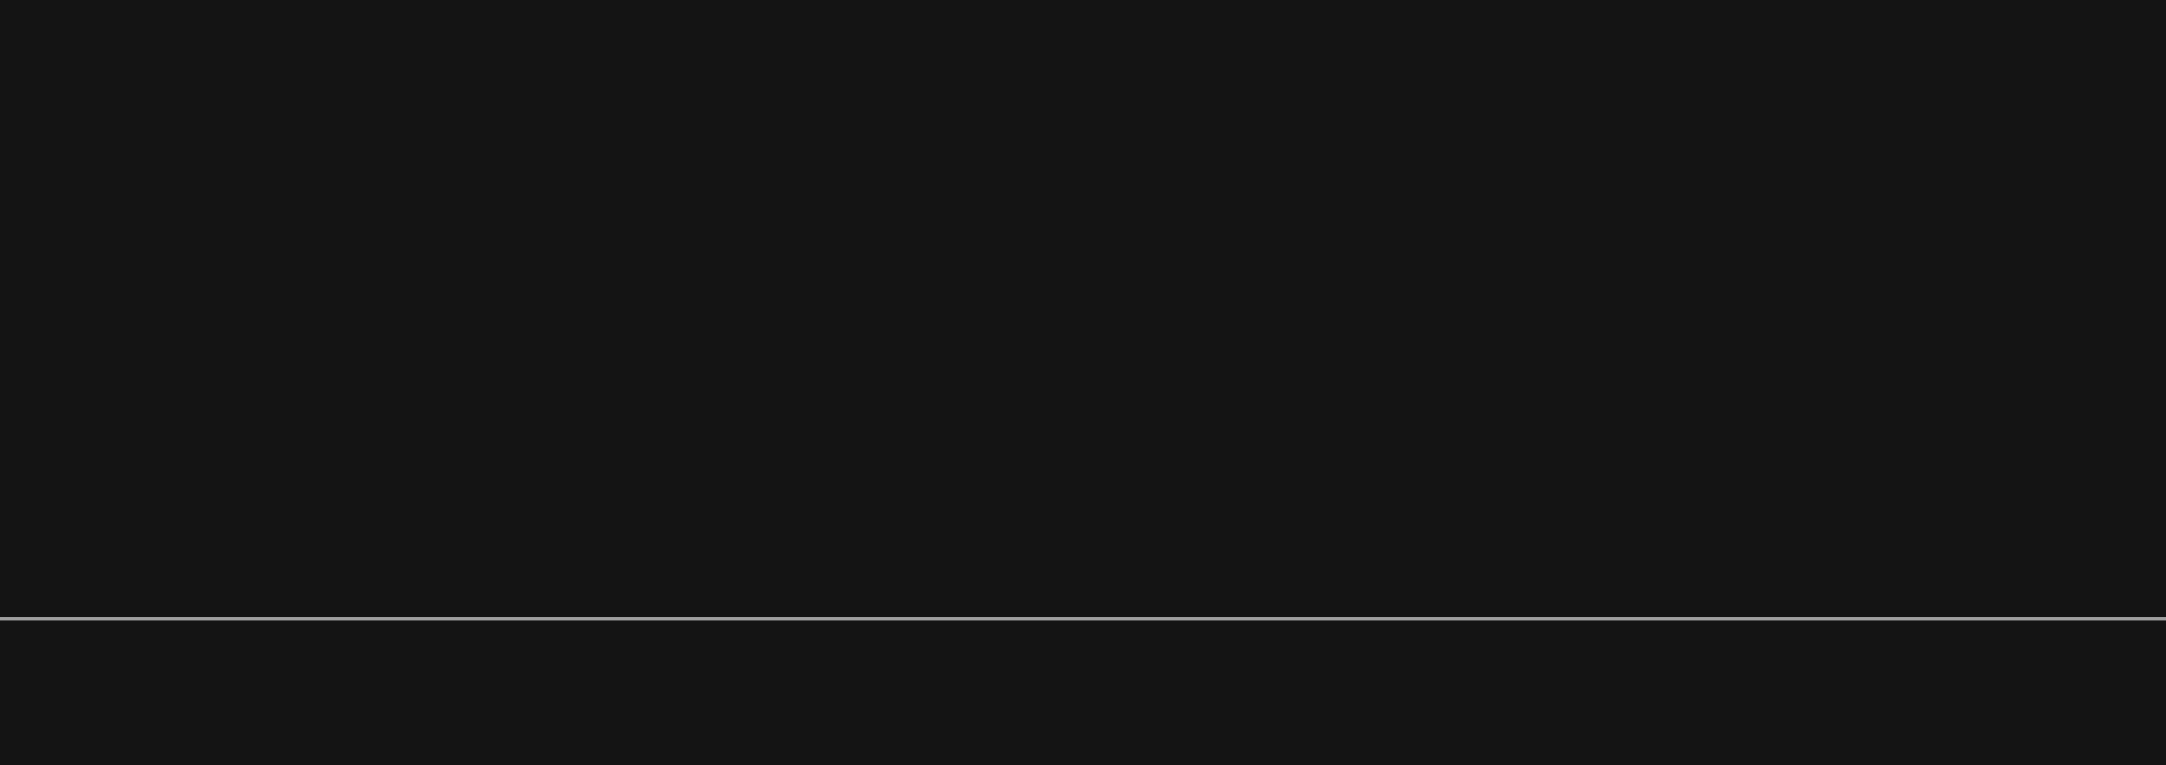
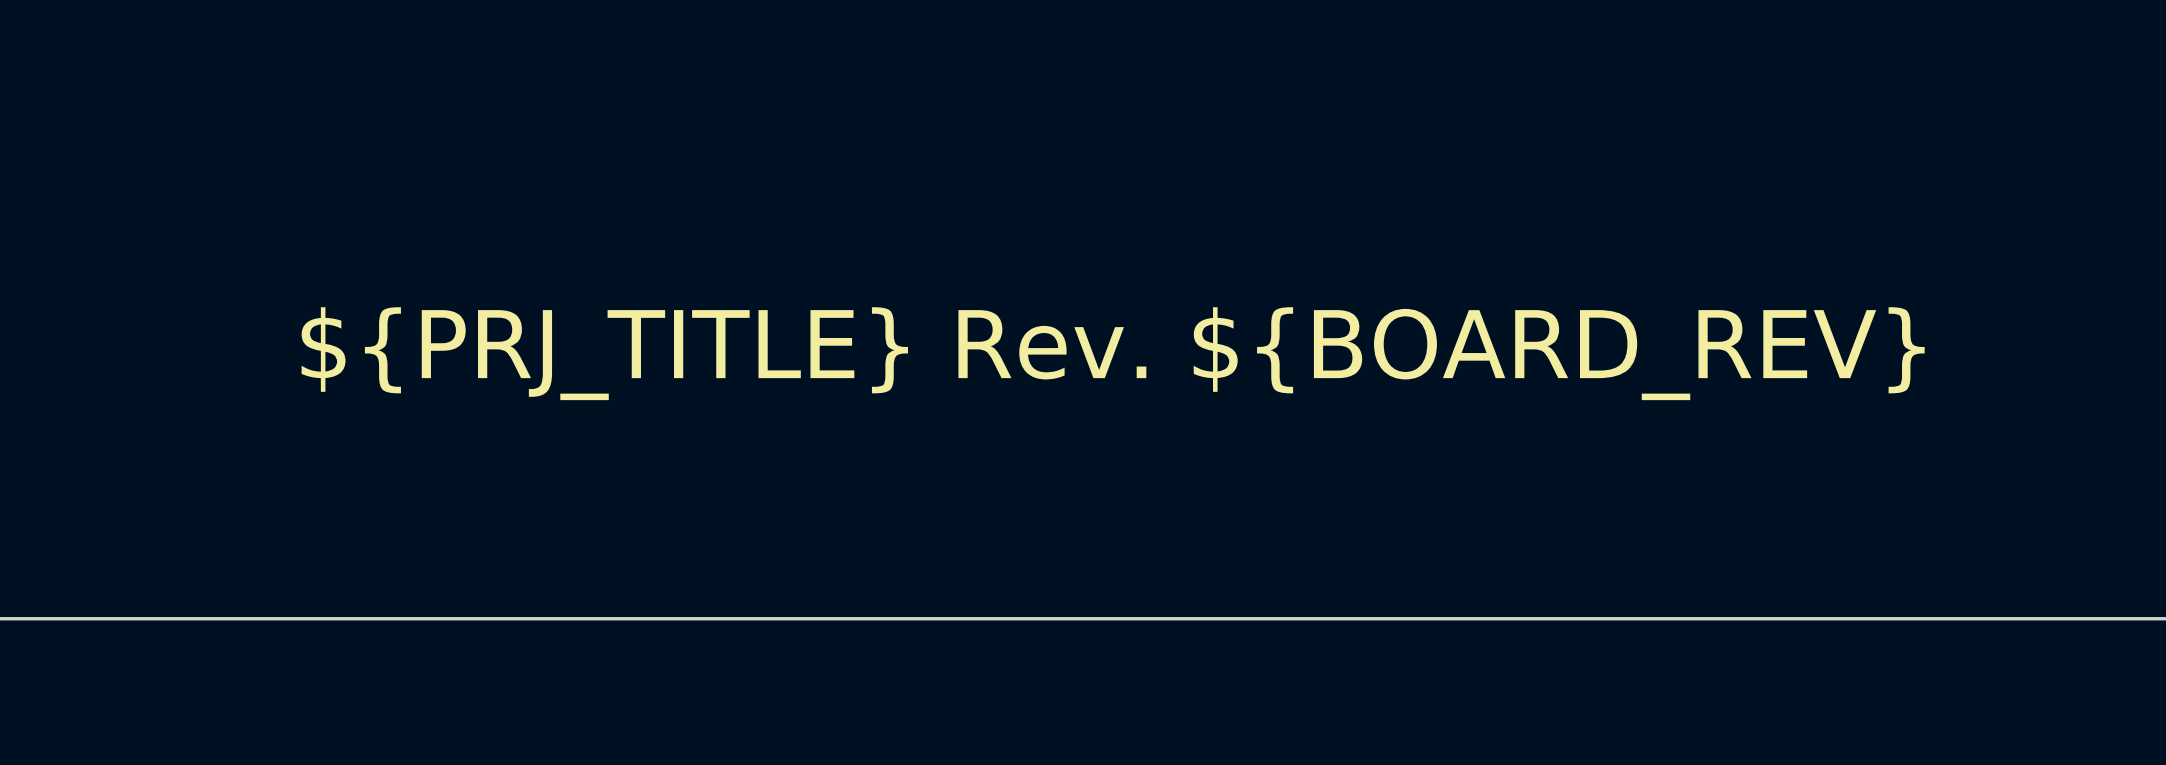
text: none -> ${PRJ_TITLE} Rev. ${BOARD_REV} (1113, 353)

